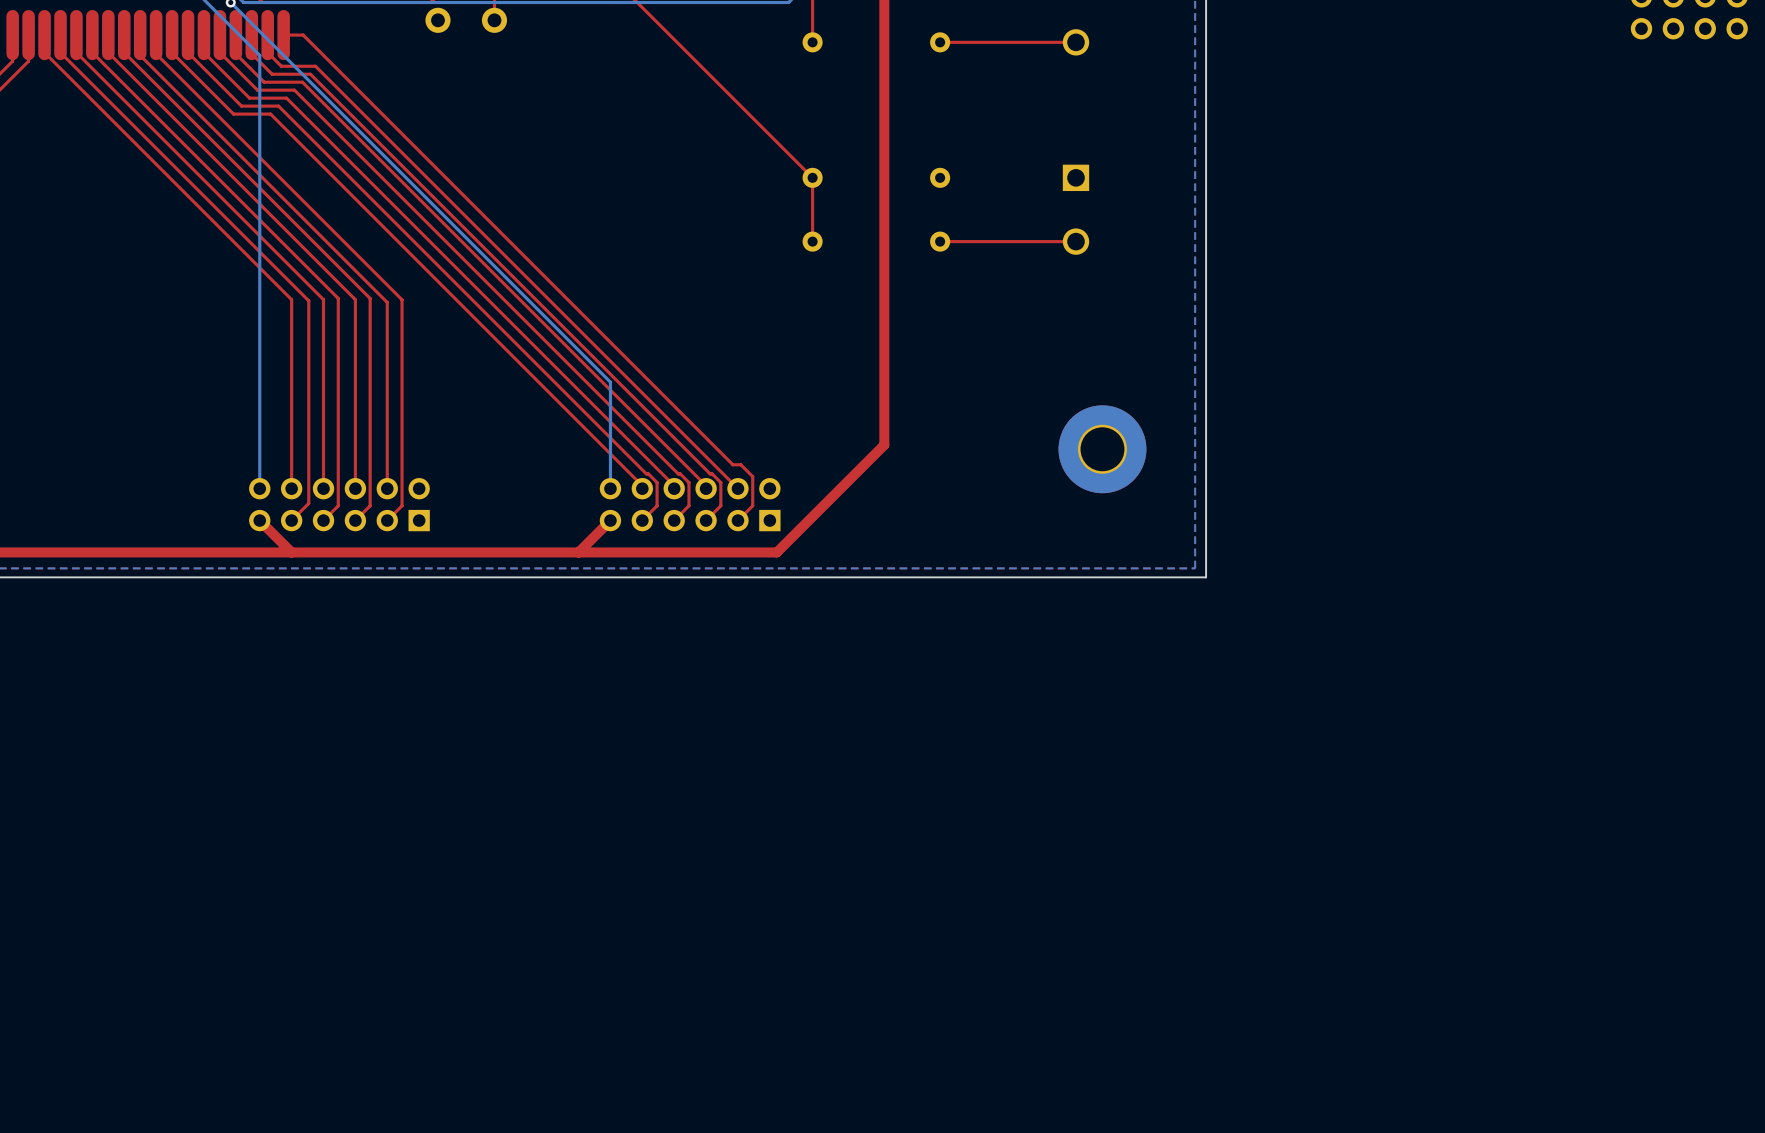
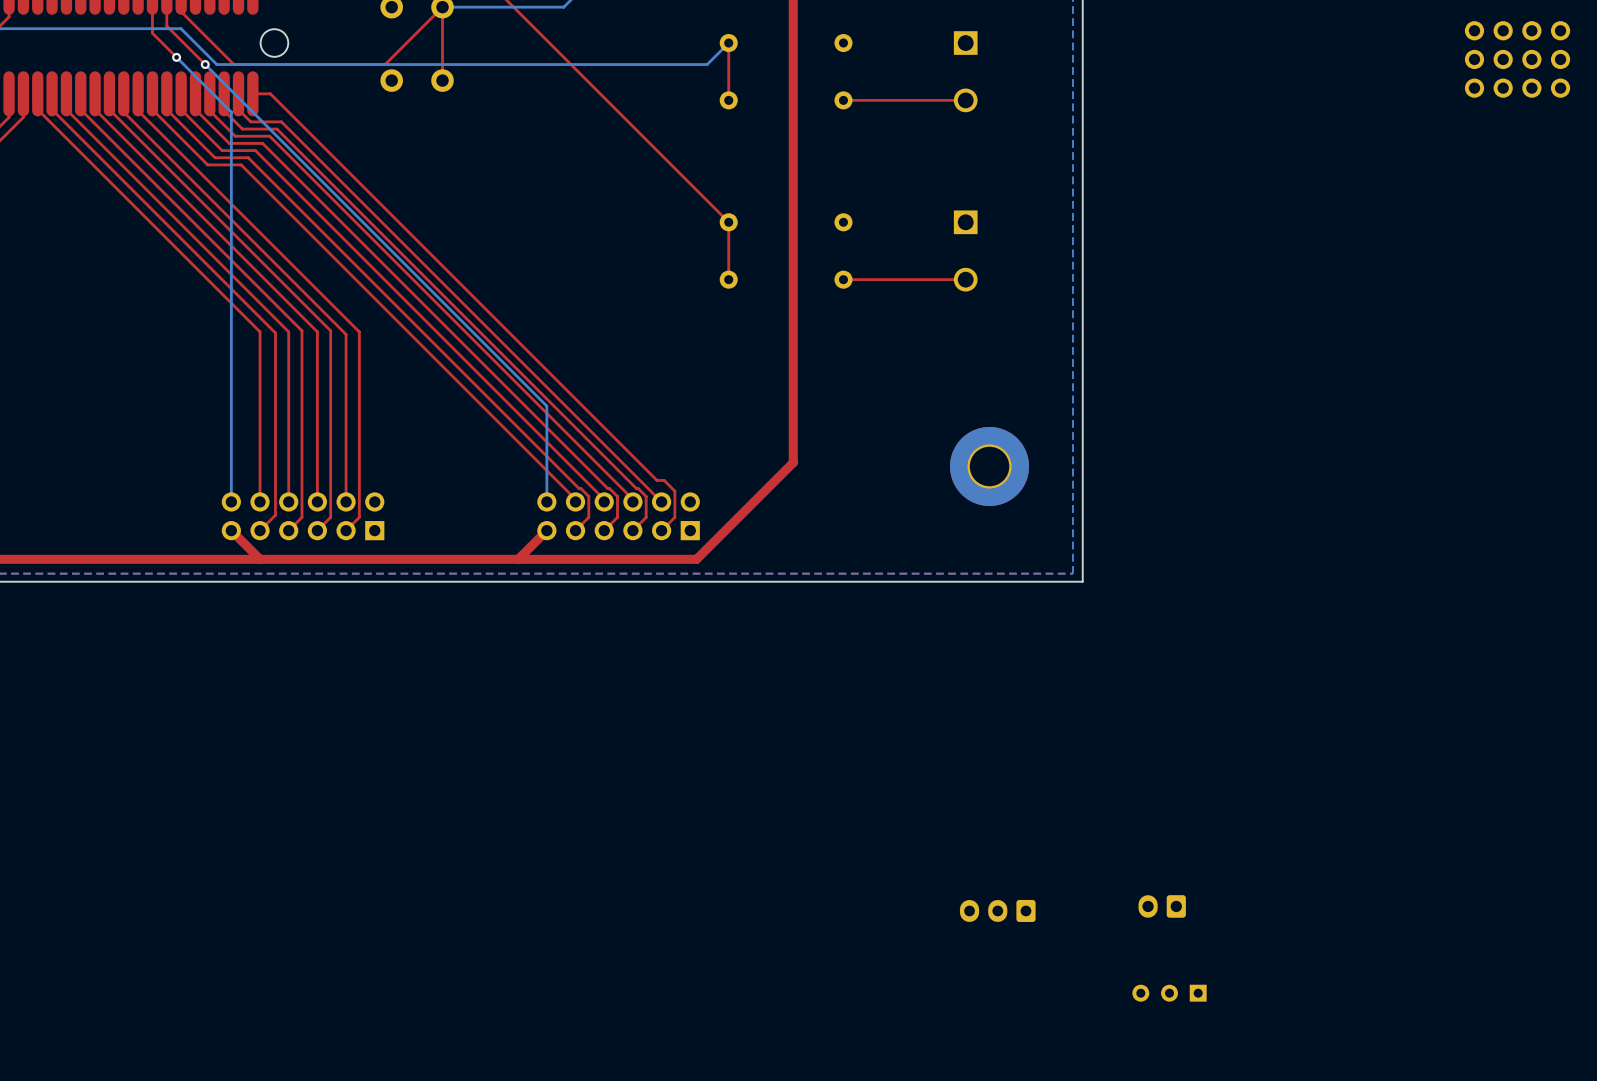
part: none -> (1162, 906)
part: none -> (997, 910)
part: none -> (1169, 993)

